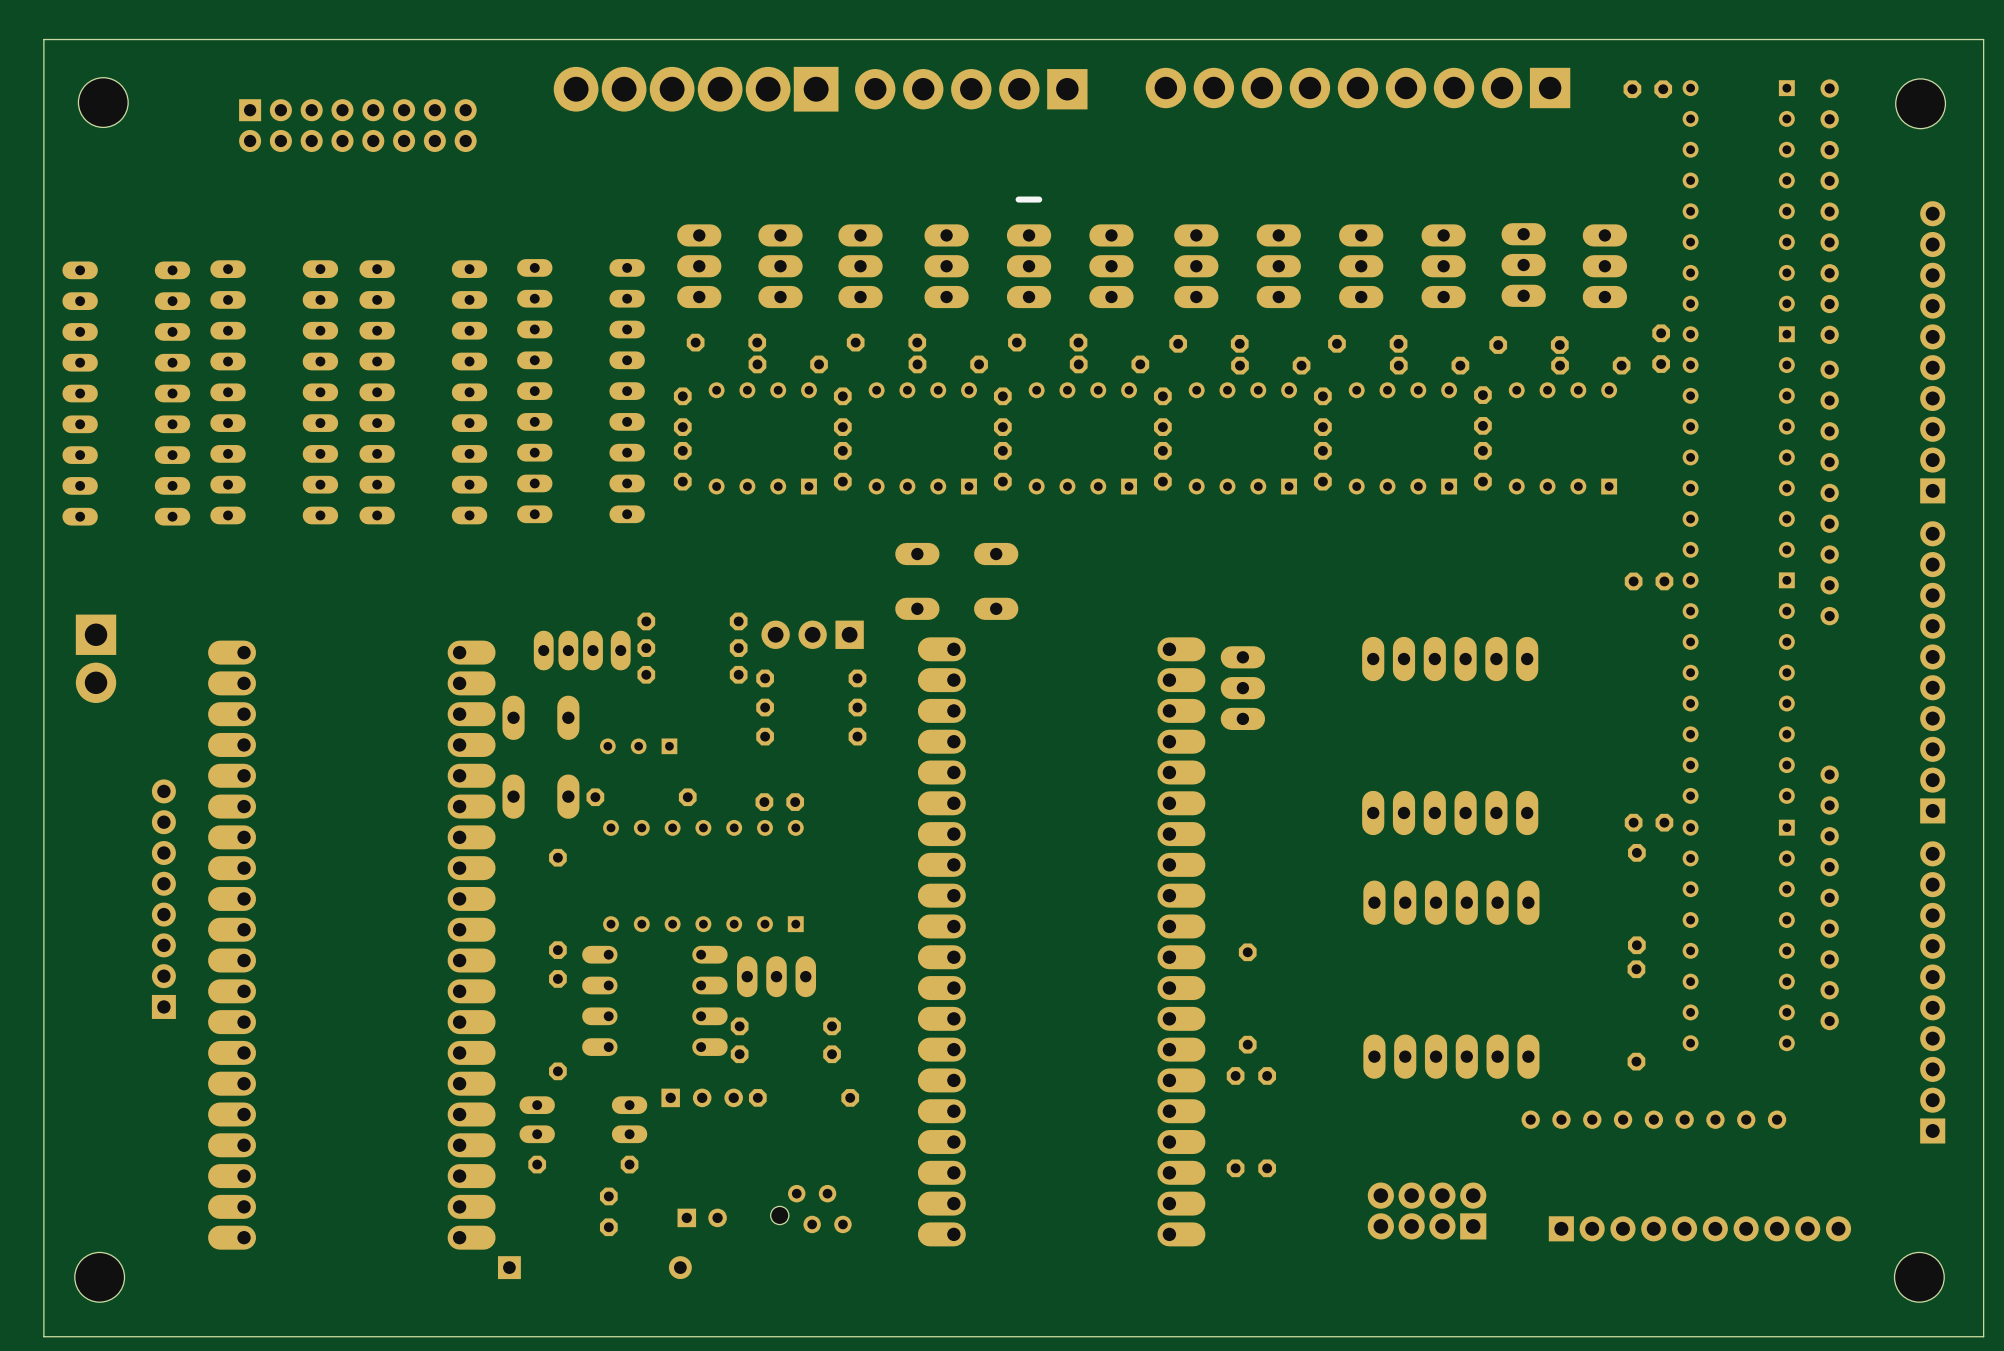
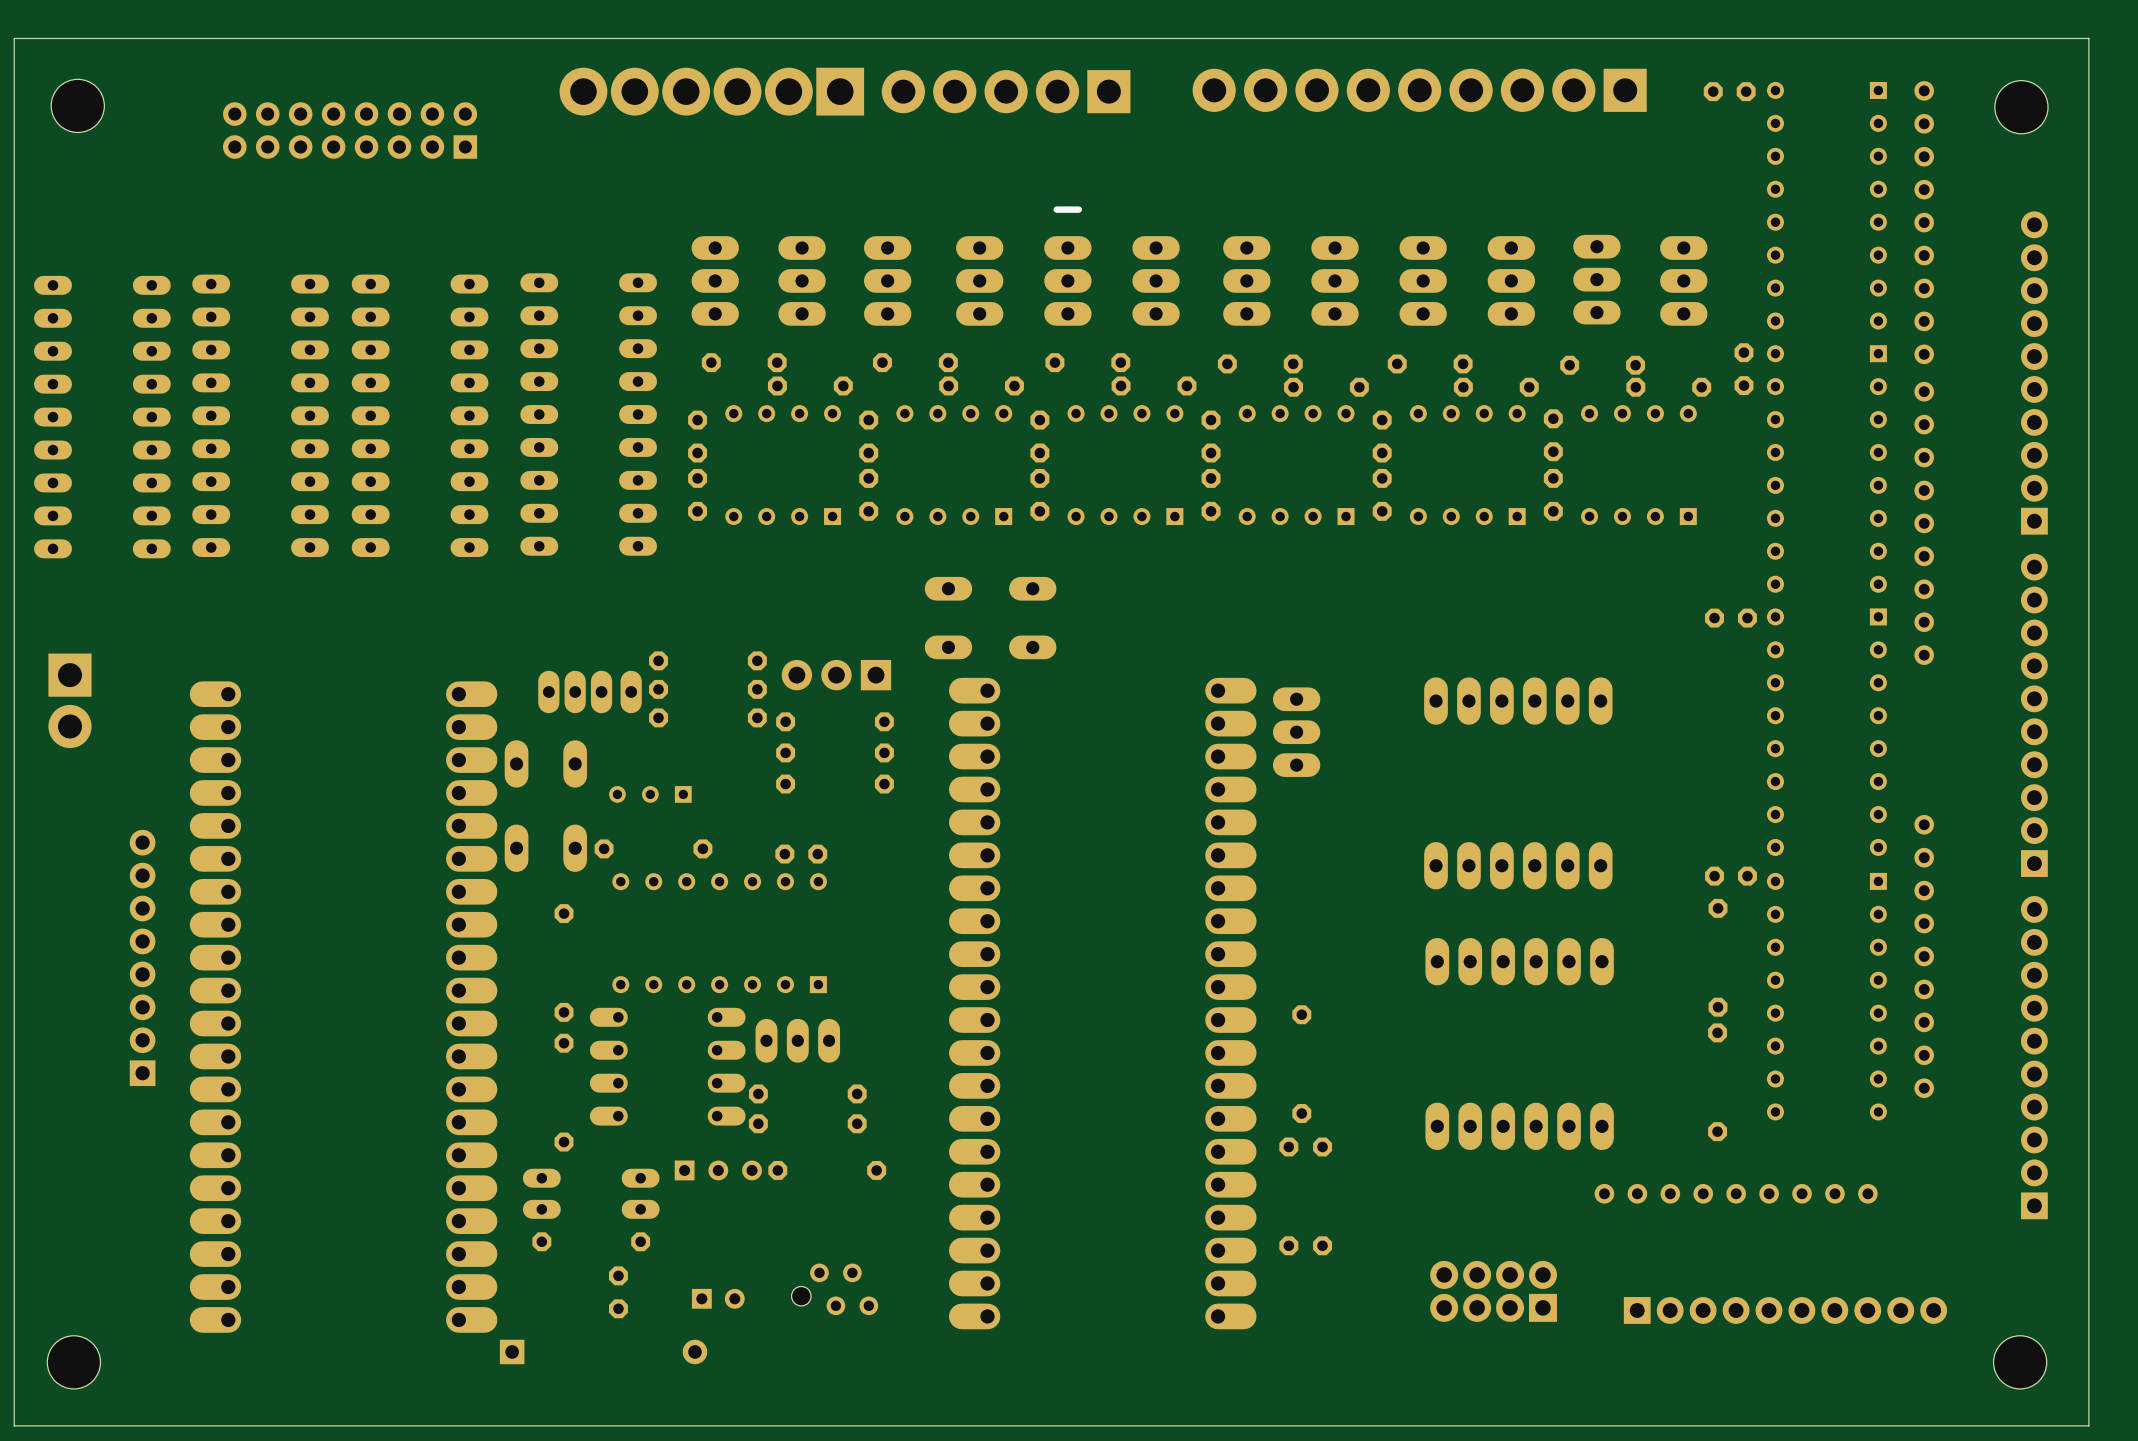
part rotation: 0° (357, 125) -> 180° (350, 130)

